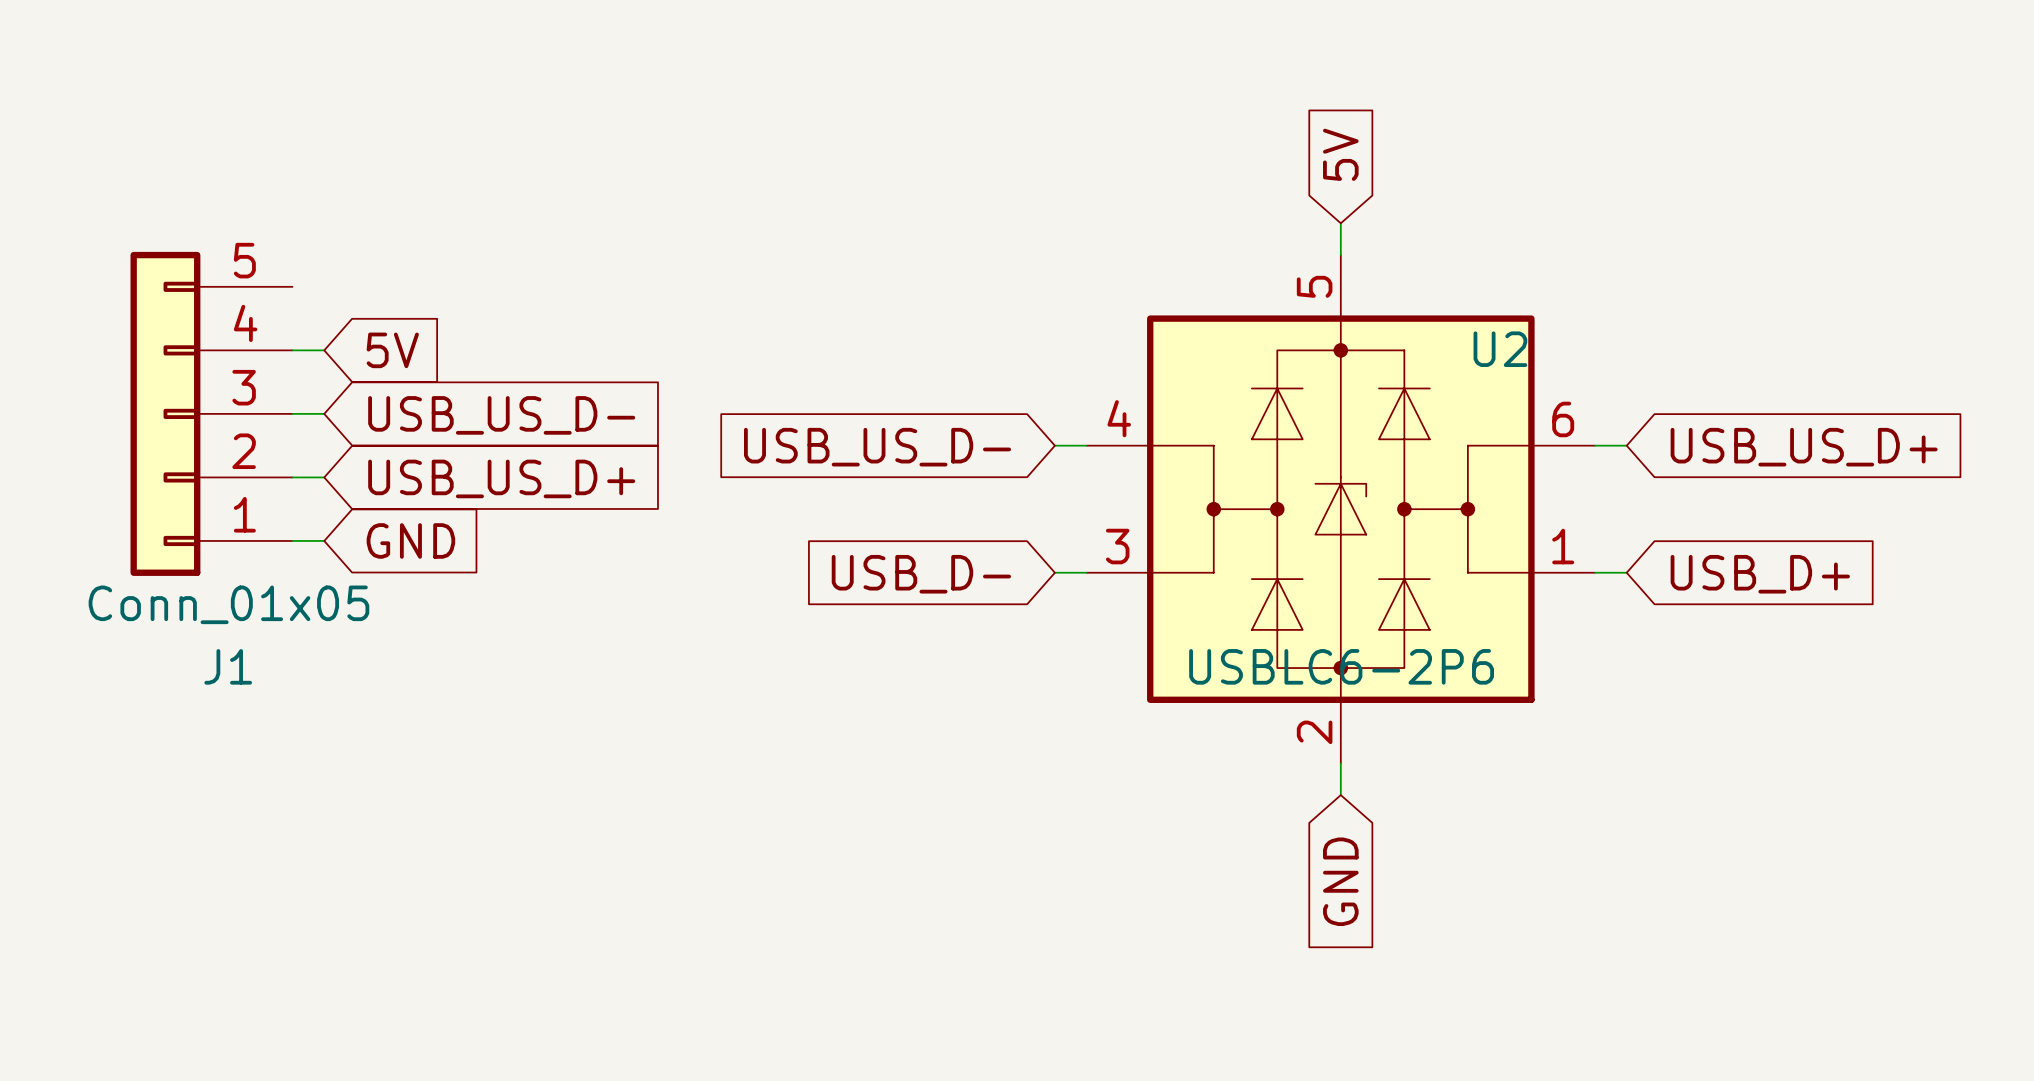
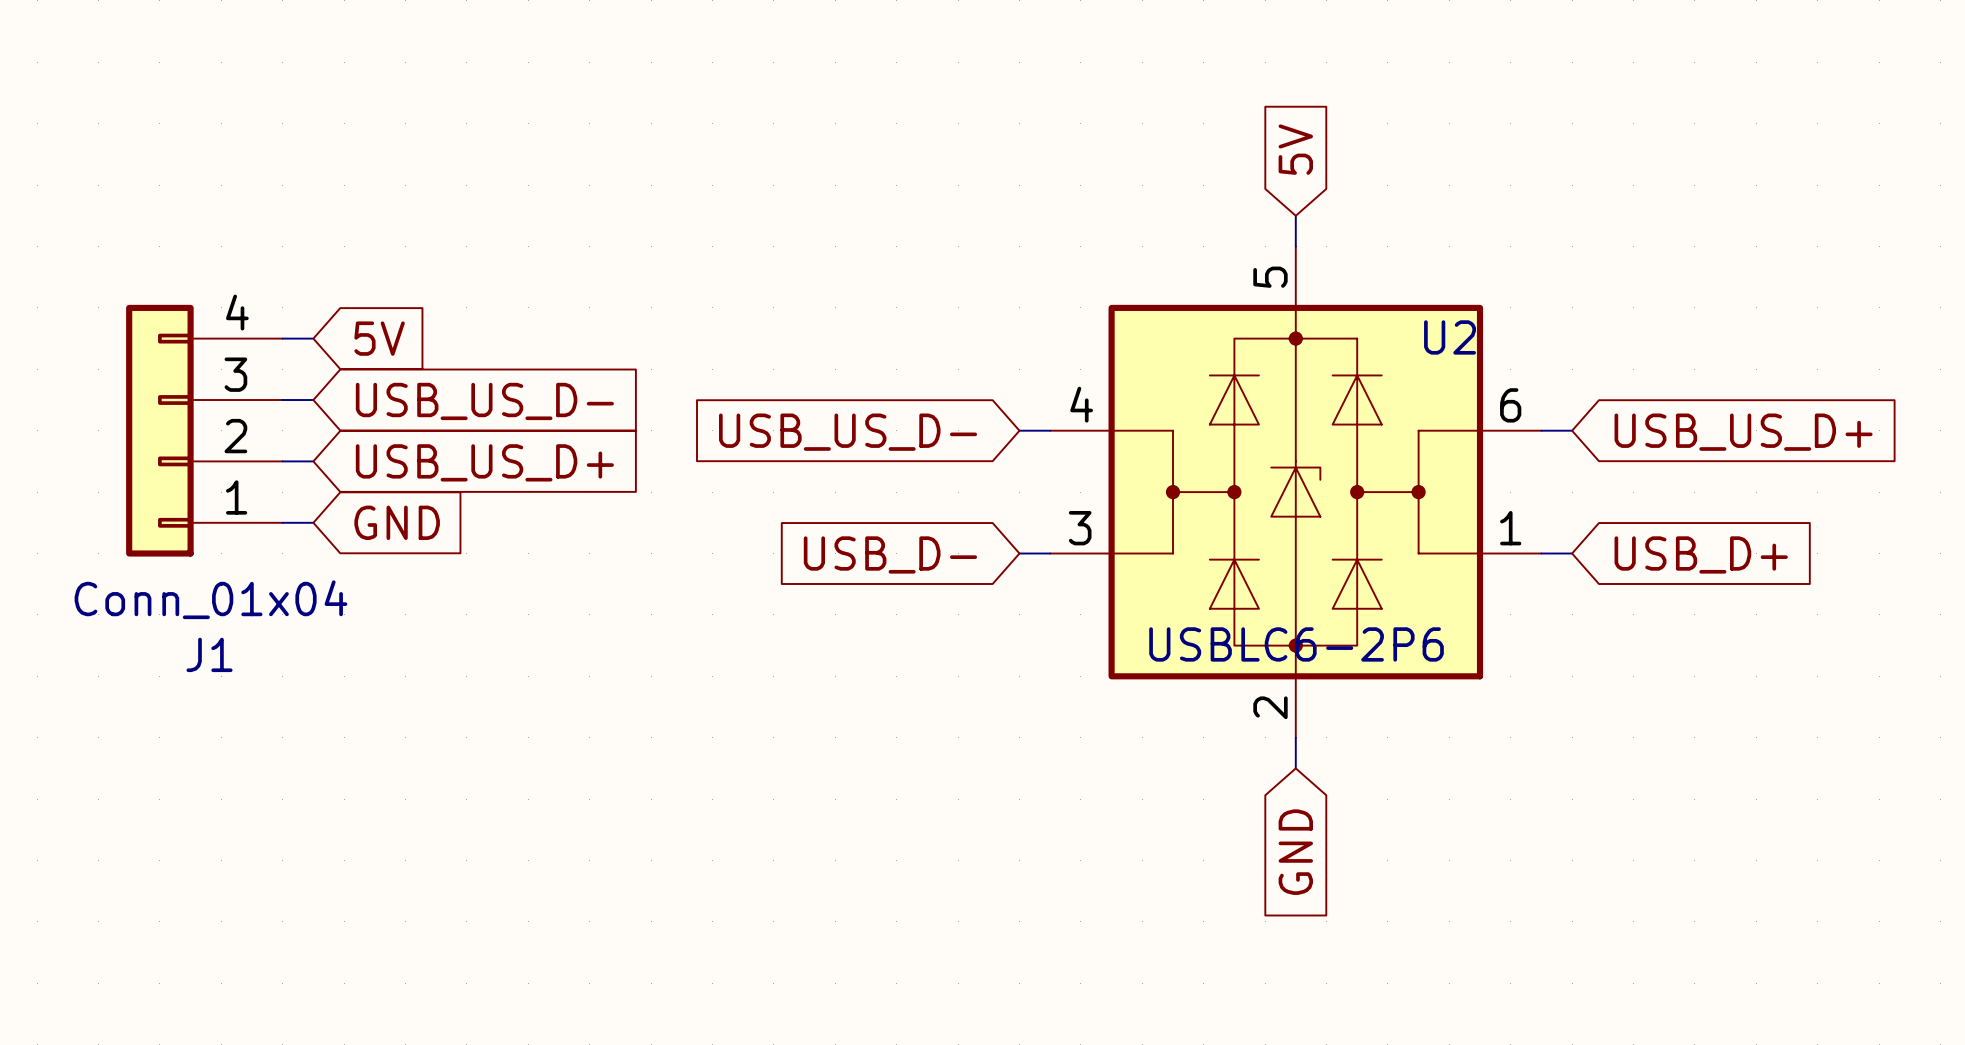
J1 symbol: [130, 251, 293, 576] -> [126, 304, 283, 557]
J1 value: Conn_01x05 (228, 604) -> Conn_01x04 (210, 599)

